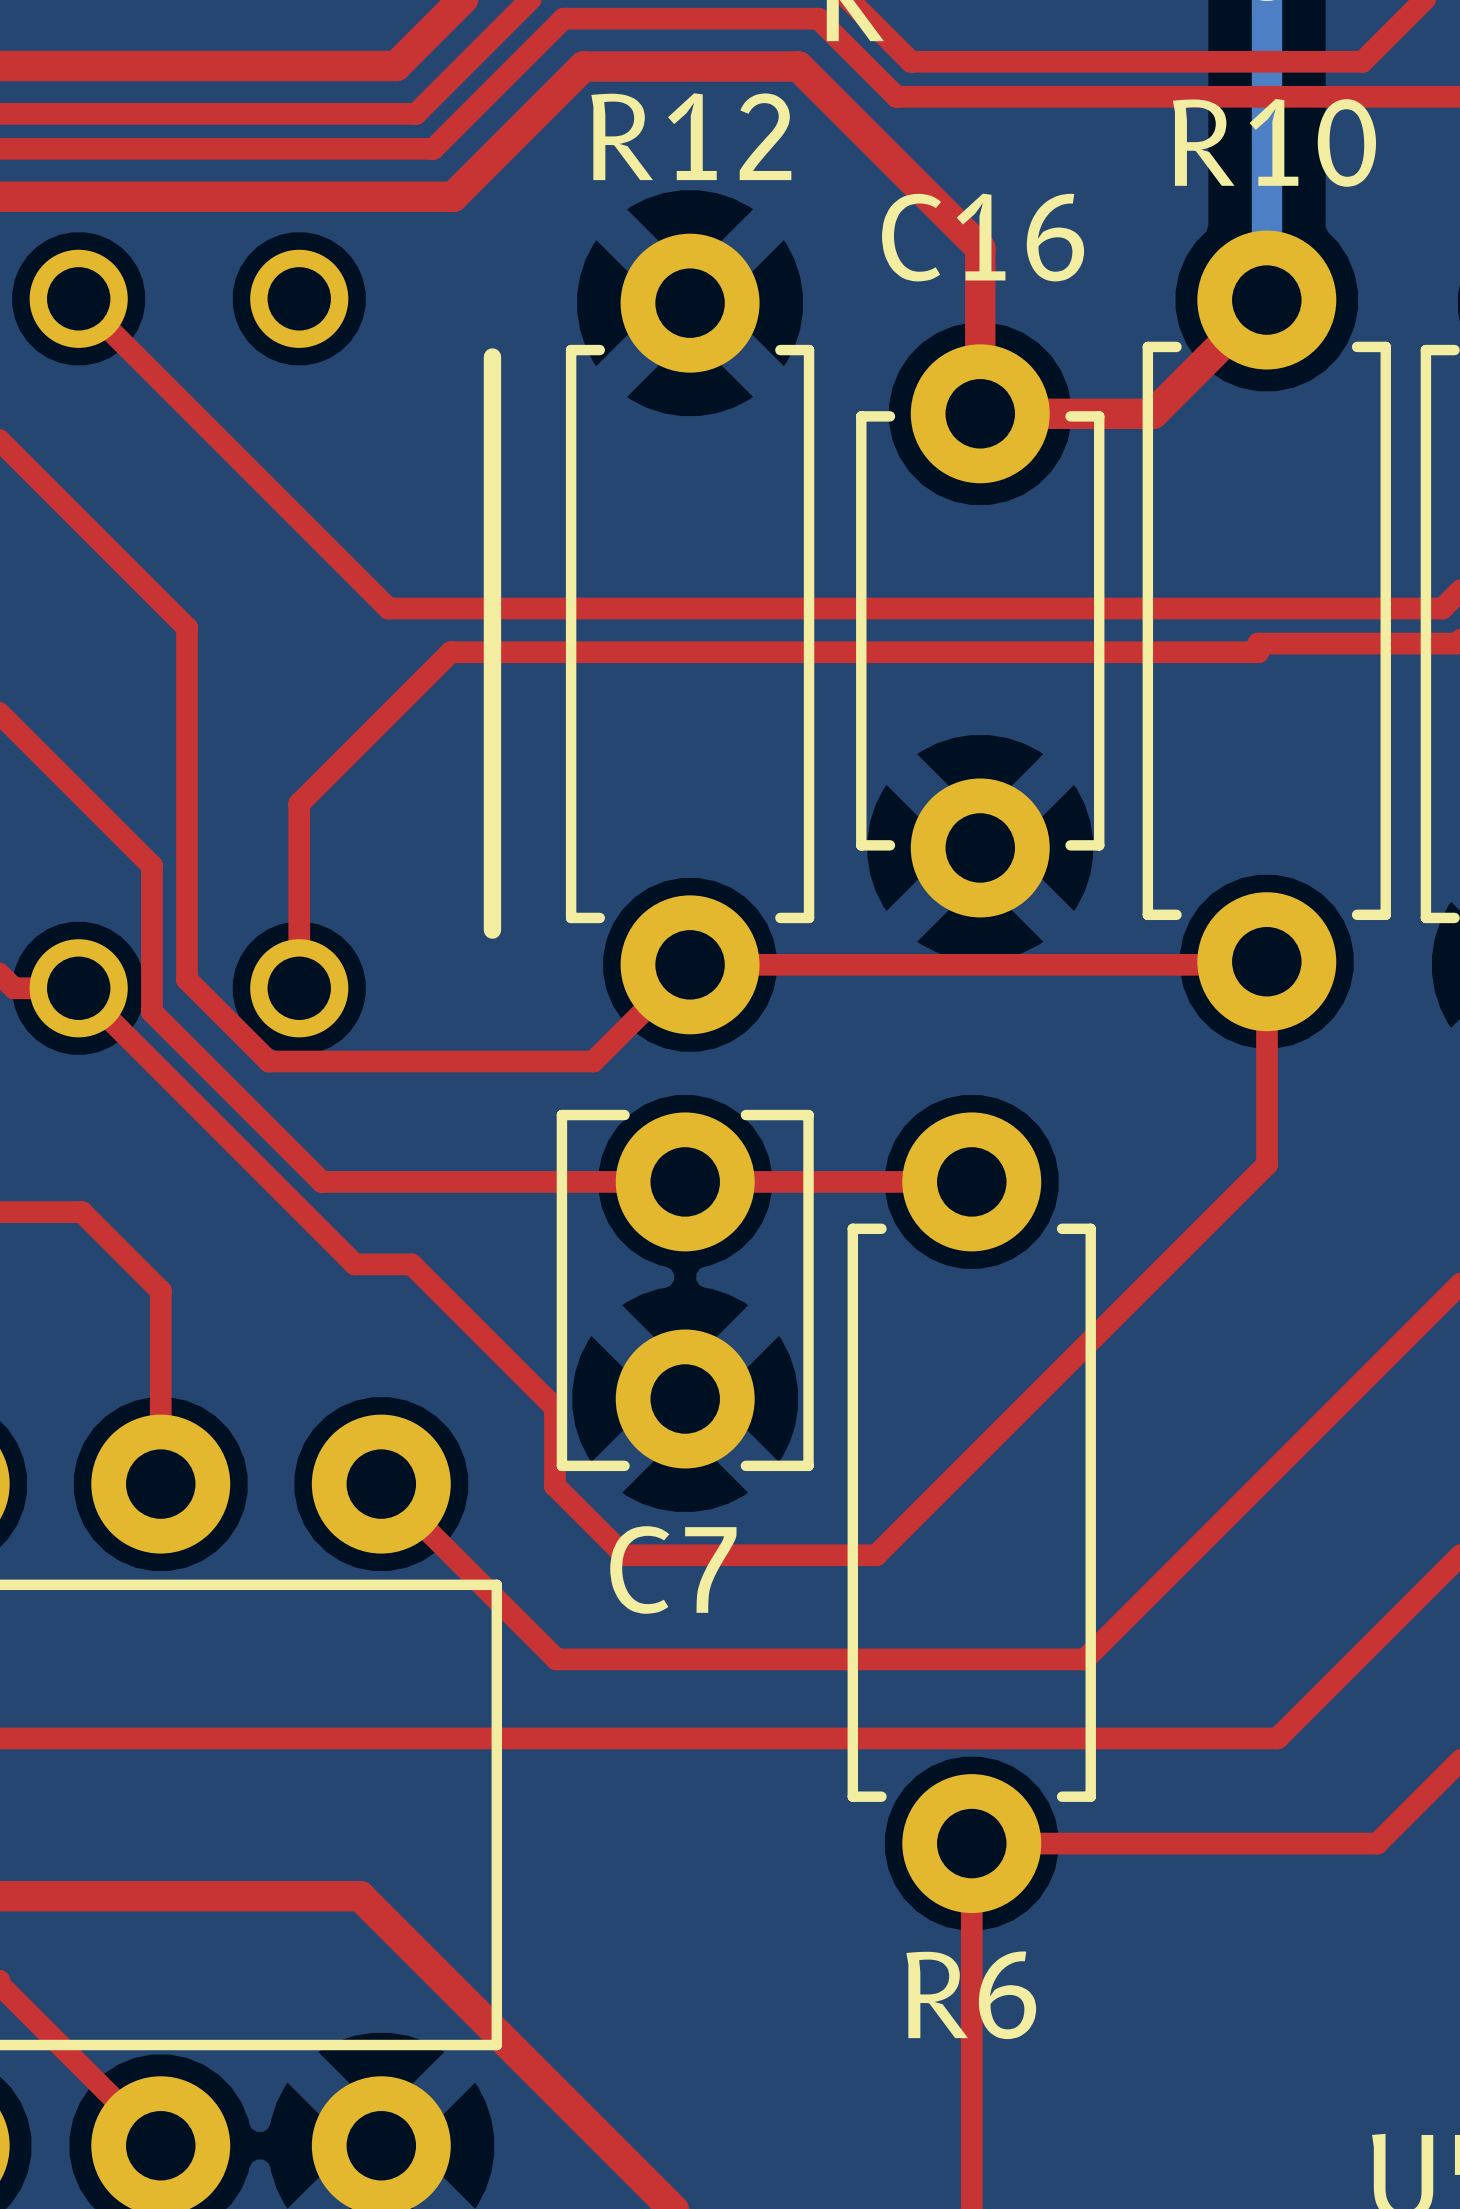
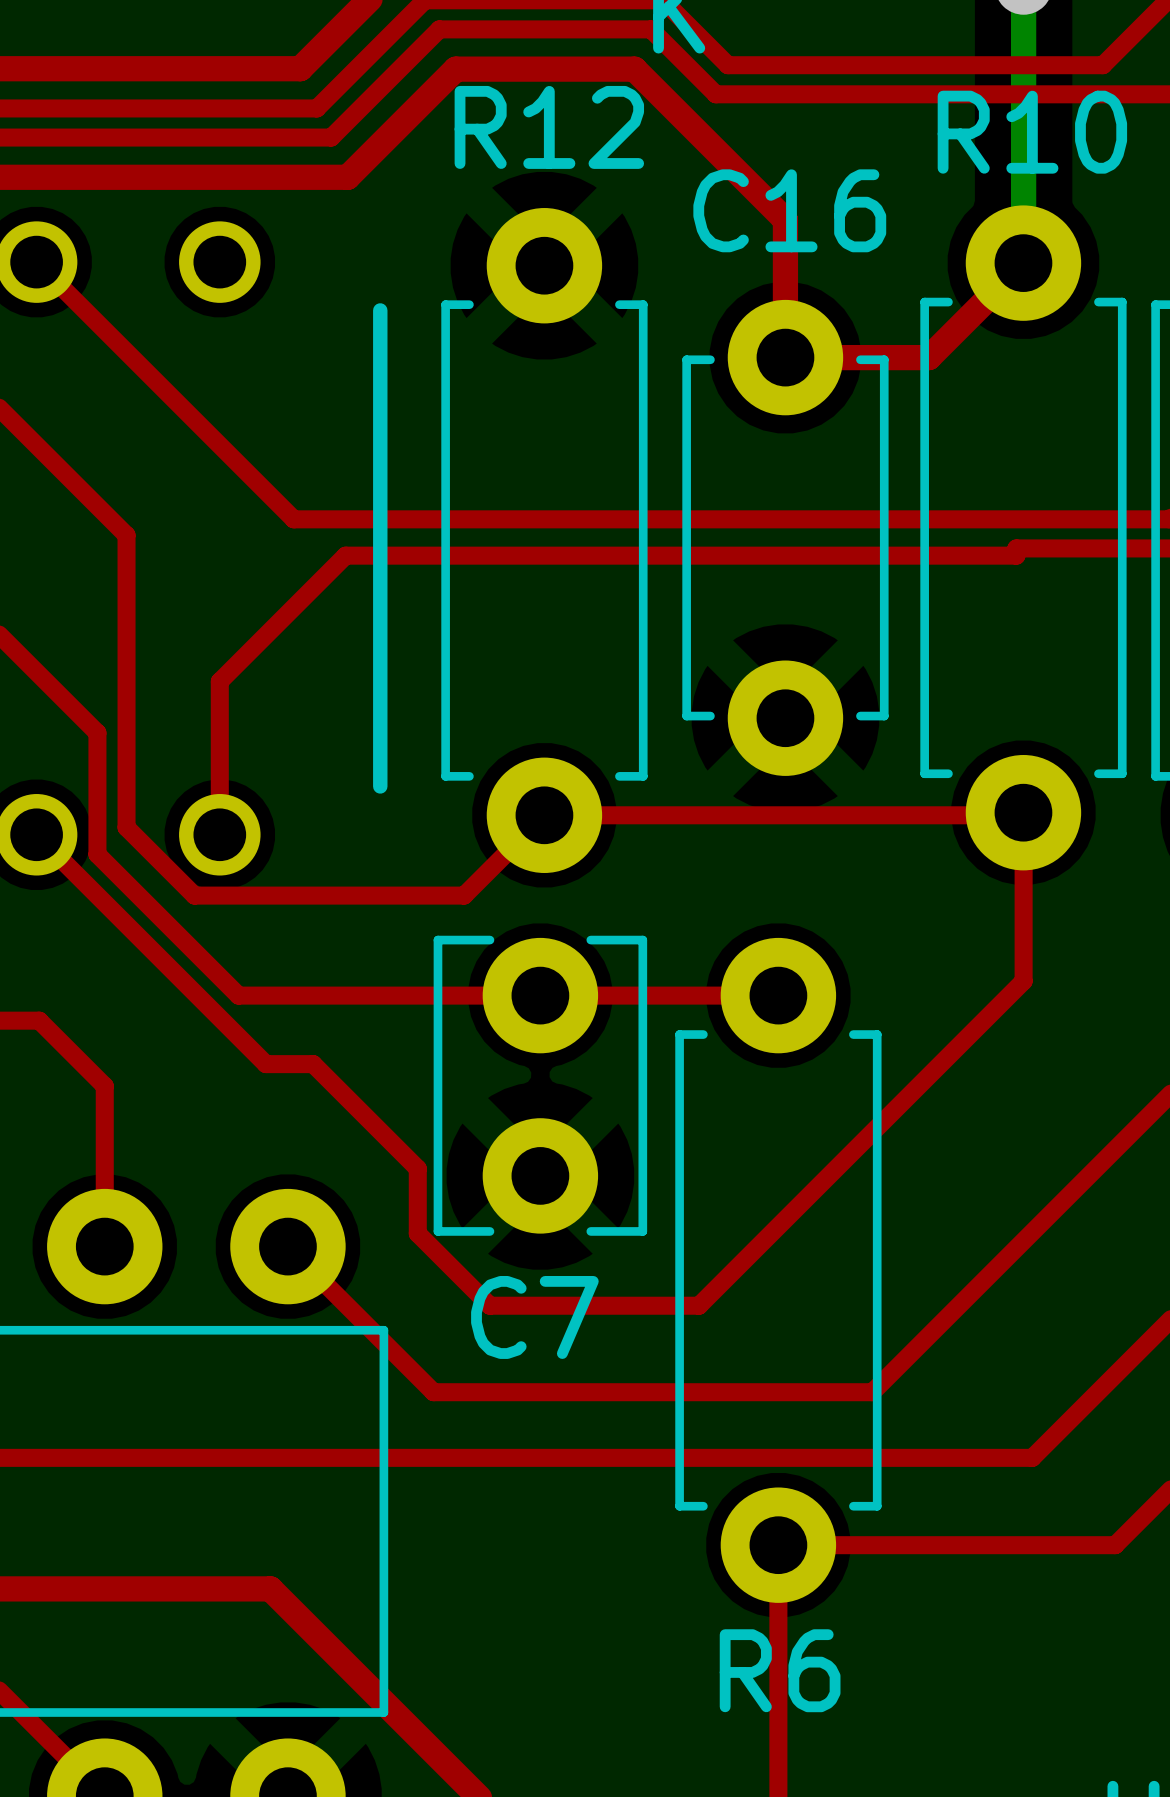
top track: (537, 1390) (554, 1407) (554, 1485) -> (417, 1168) (417, 1233) (432, 1248)

